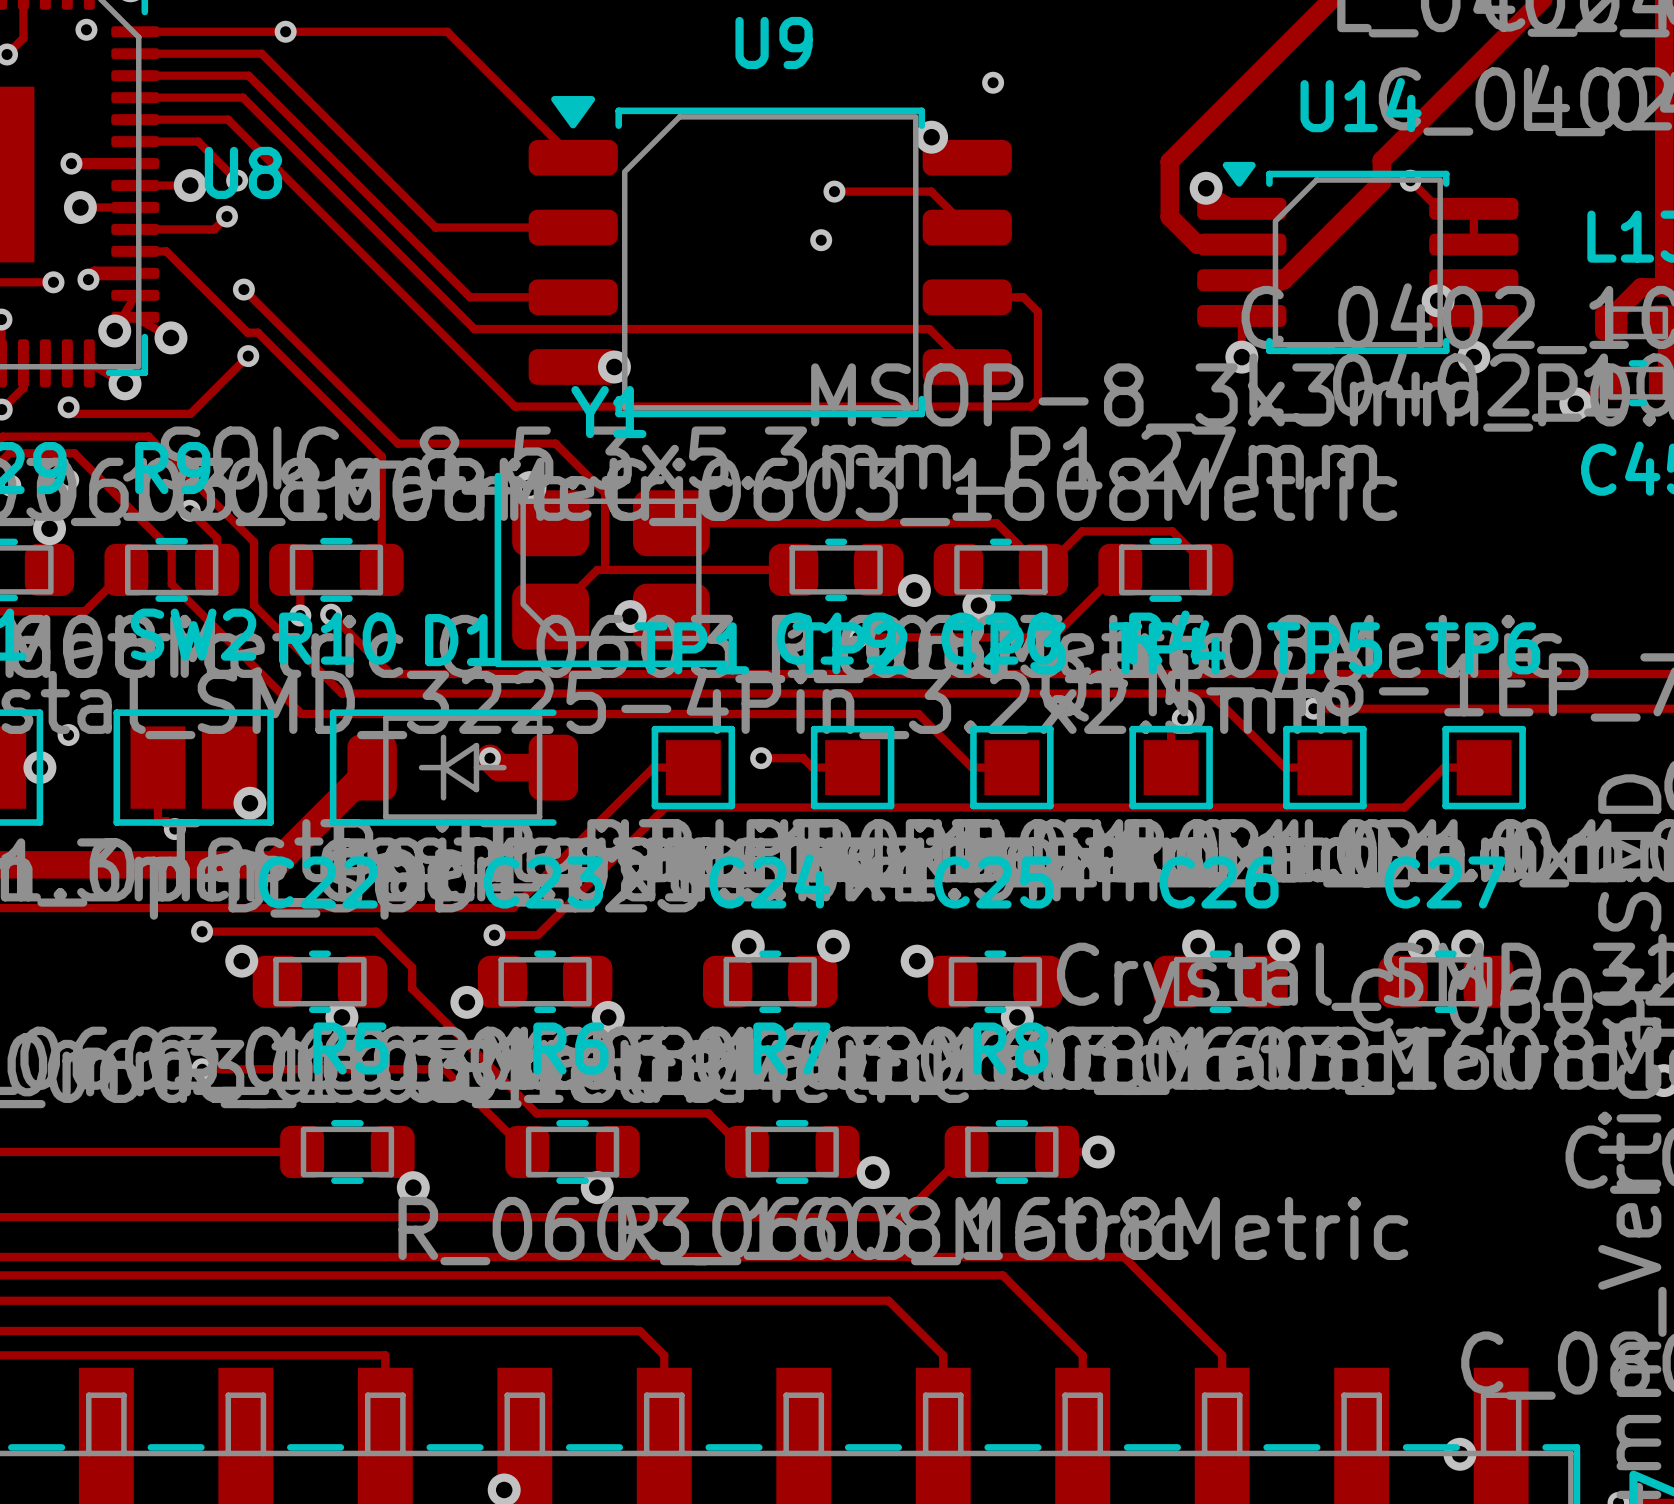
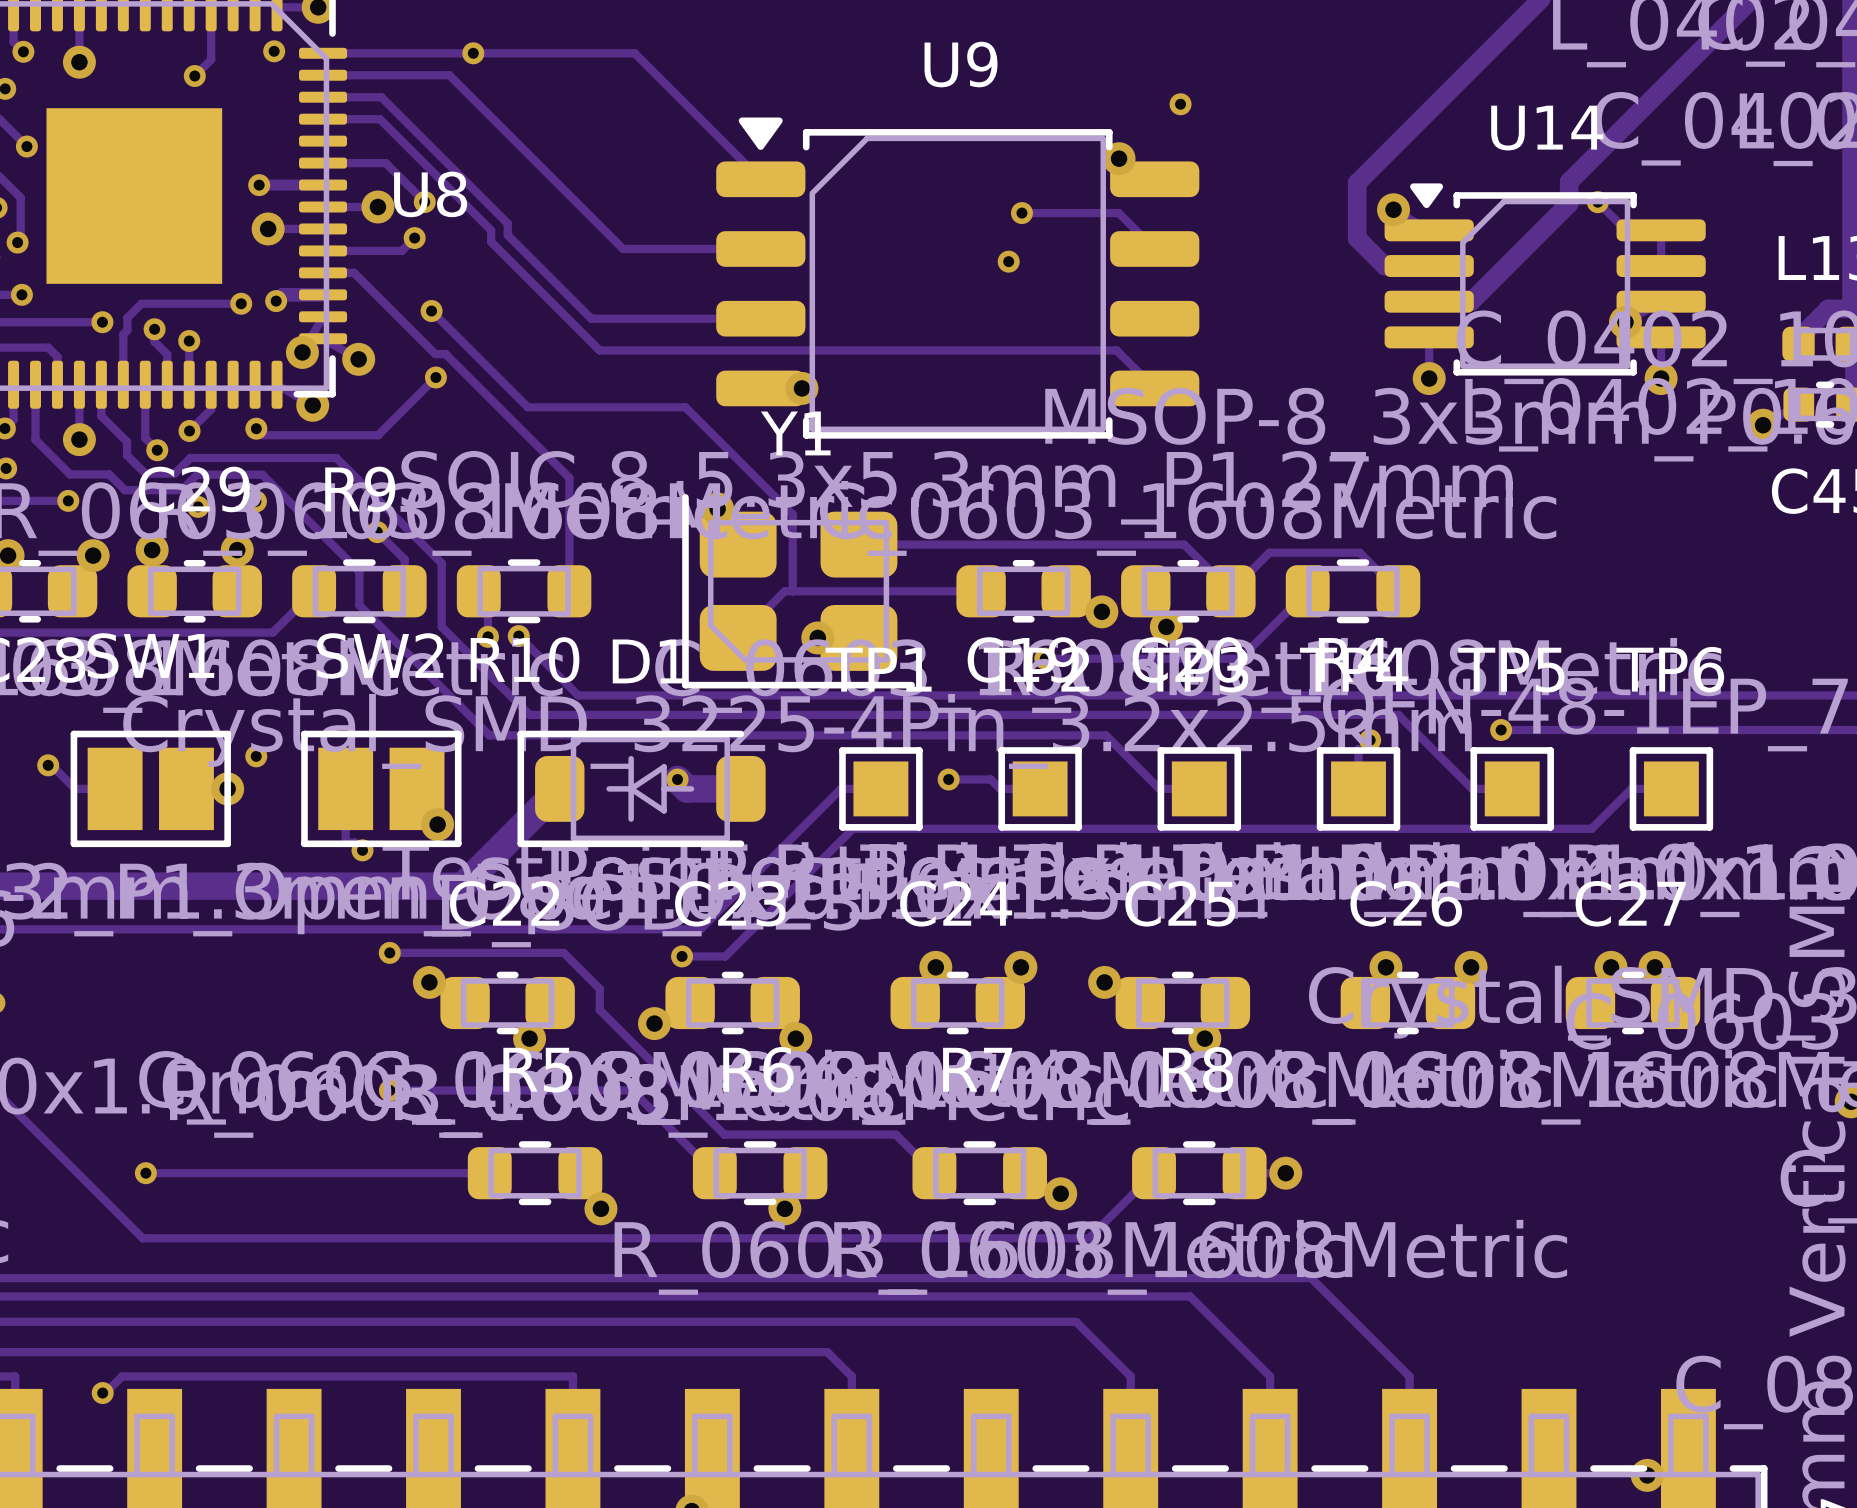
track: (193, 75) (248, 75) (470, 297) -> (381, 97) (507, 223) (507, 235) (591, 318) (657, 318)
track: (192, 97) (243, 97) (474, 329) -> (379, 119) (491, 230) (491, 241) (599, 350) (662, 350)
track: (135, 119) (227, 119) (514, 406) (1031, 406) (1037, 399) (1037, 311) (1023, 297) (967, 297) -> none
track: (340, 385) (397, 443) (555, 443) -> (527, 407) (685, 407) (743, 465)

